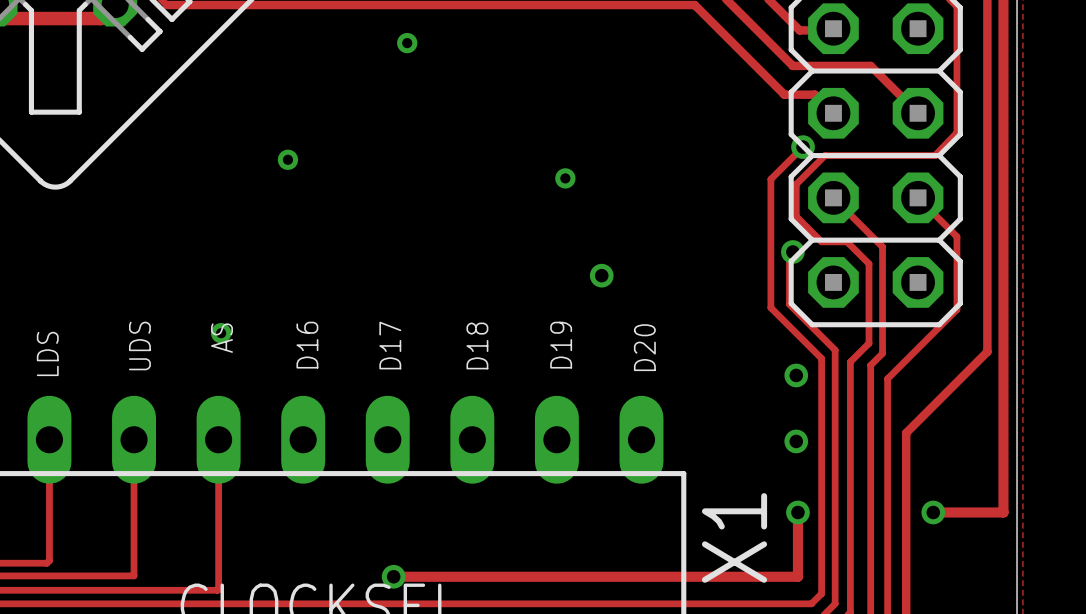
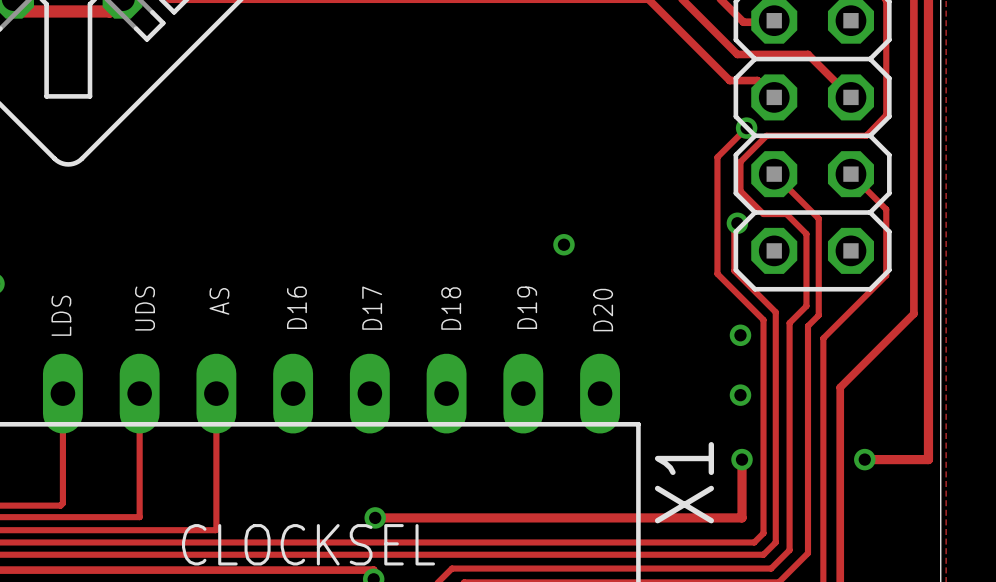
via: (407, 43) -> none
via: (287, 159) -> none
via: (565, 178) -> none
via: (221, 333) -> none

